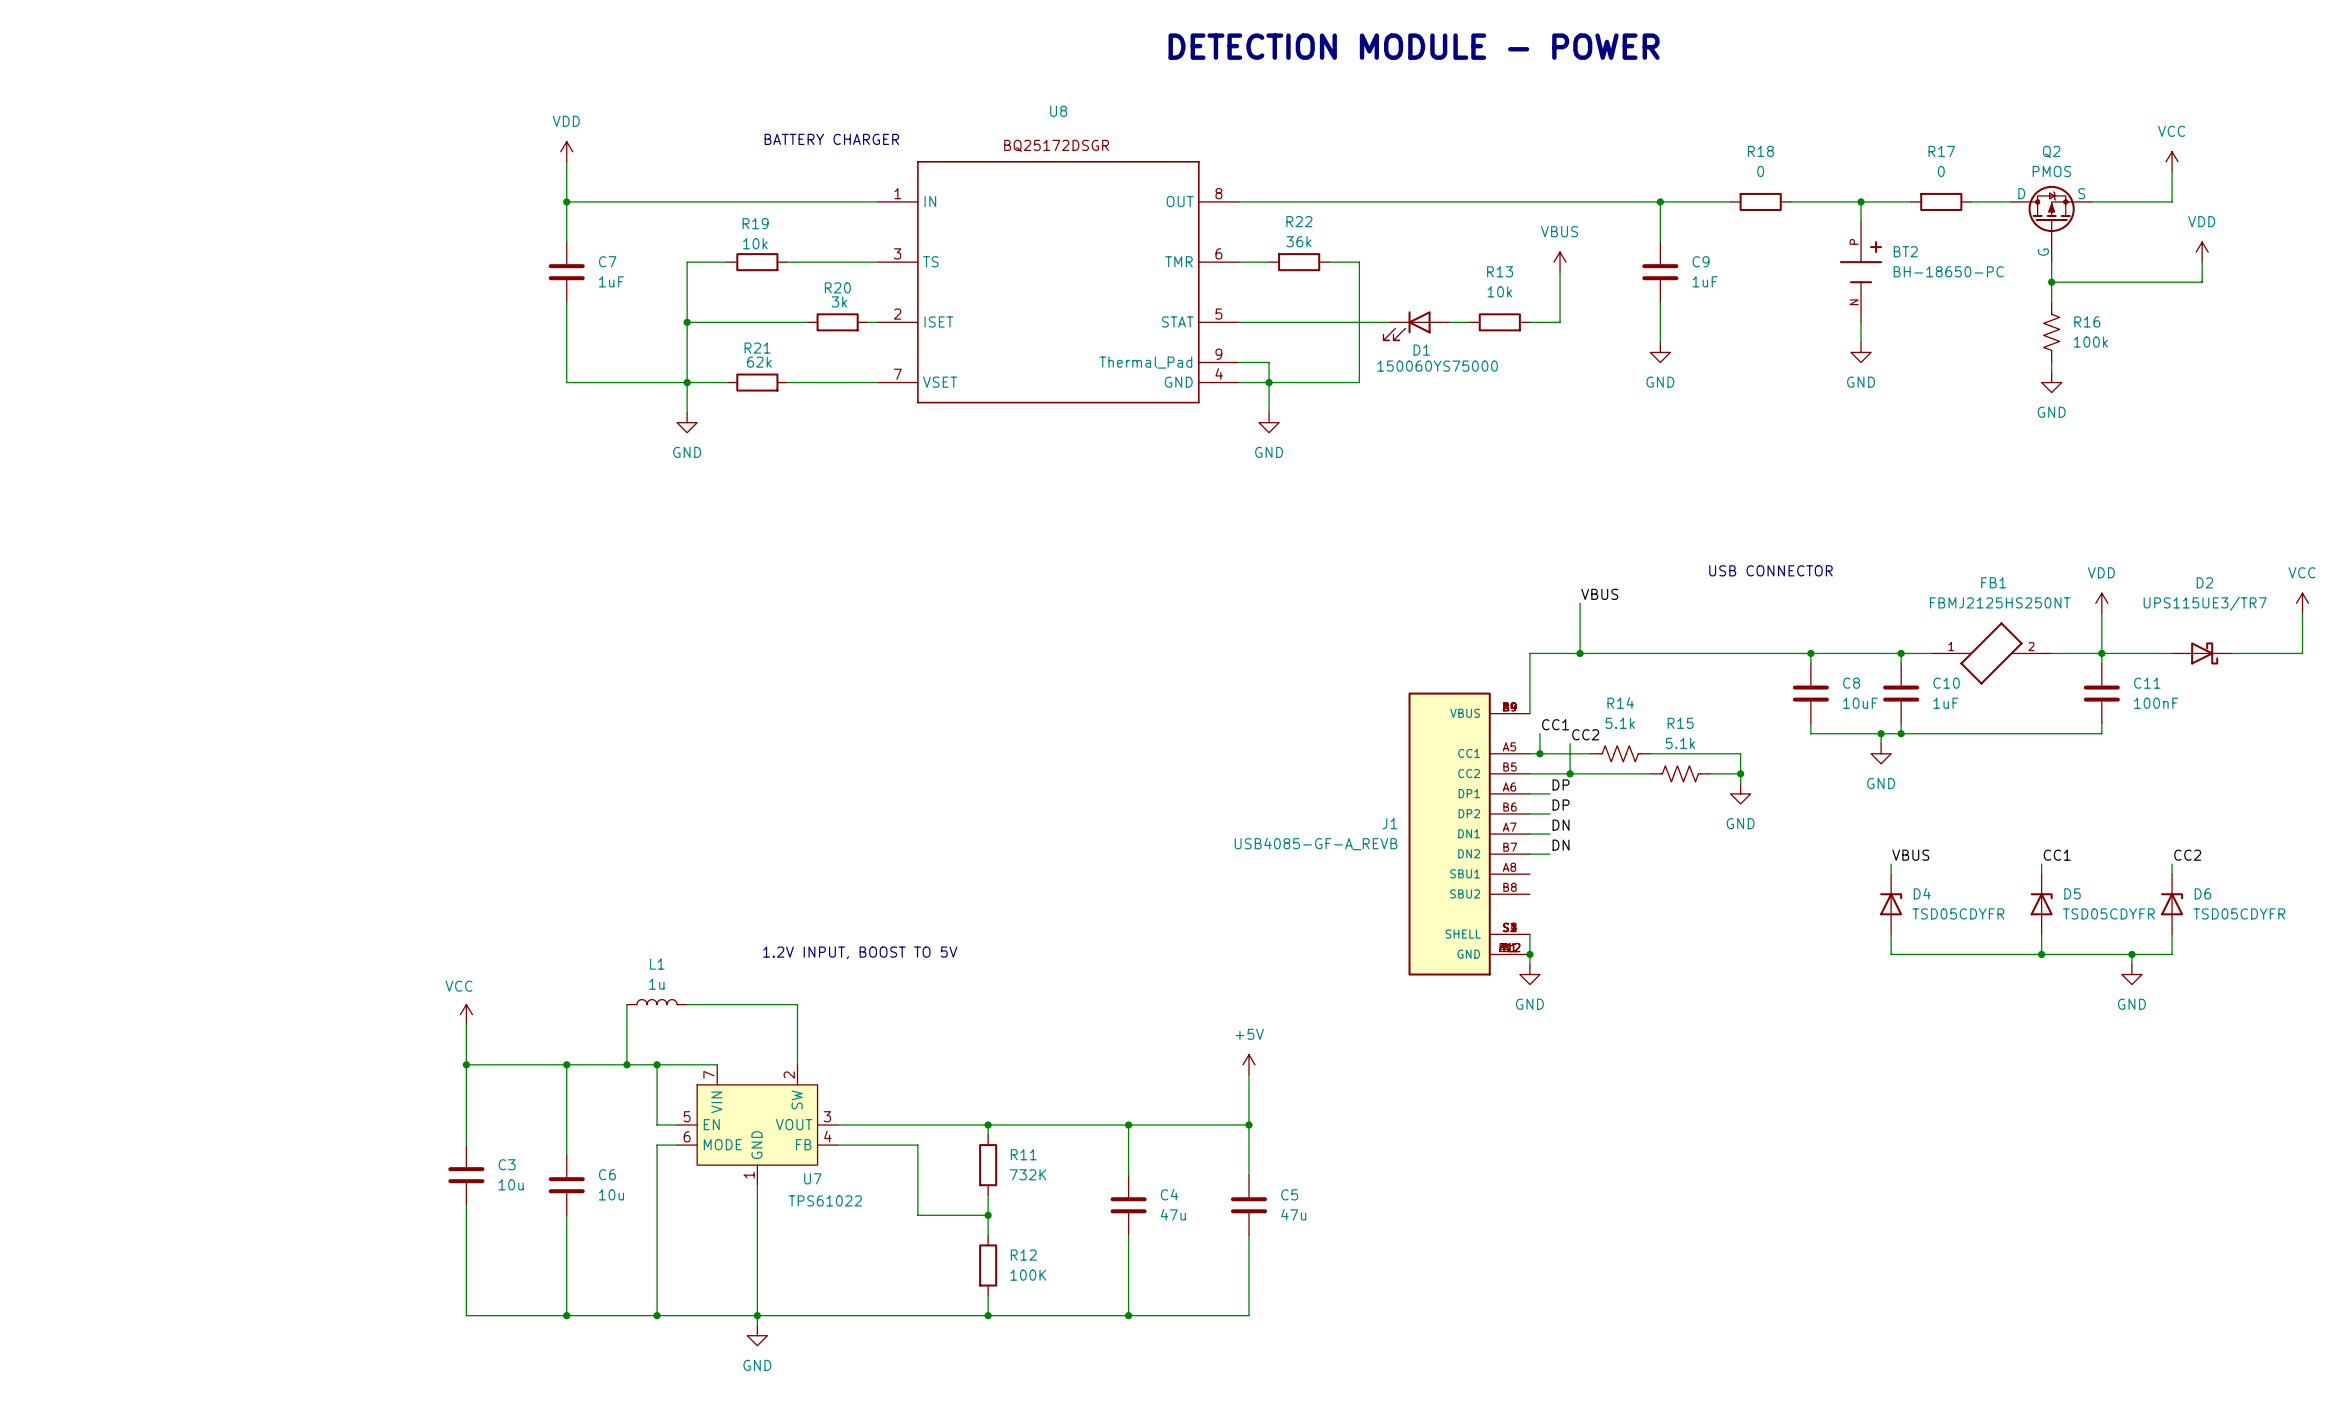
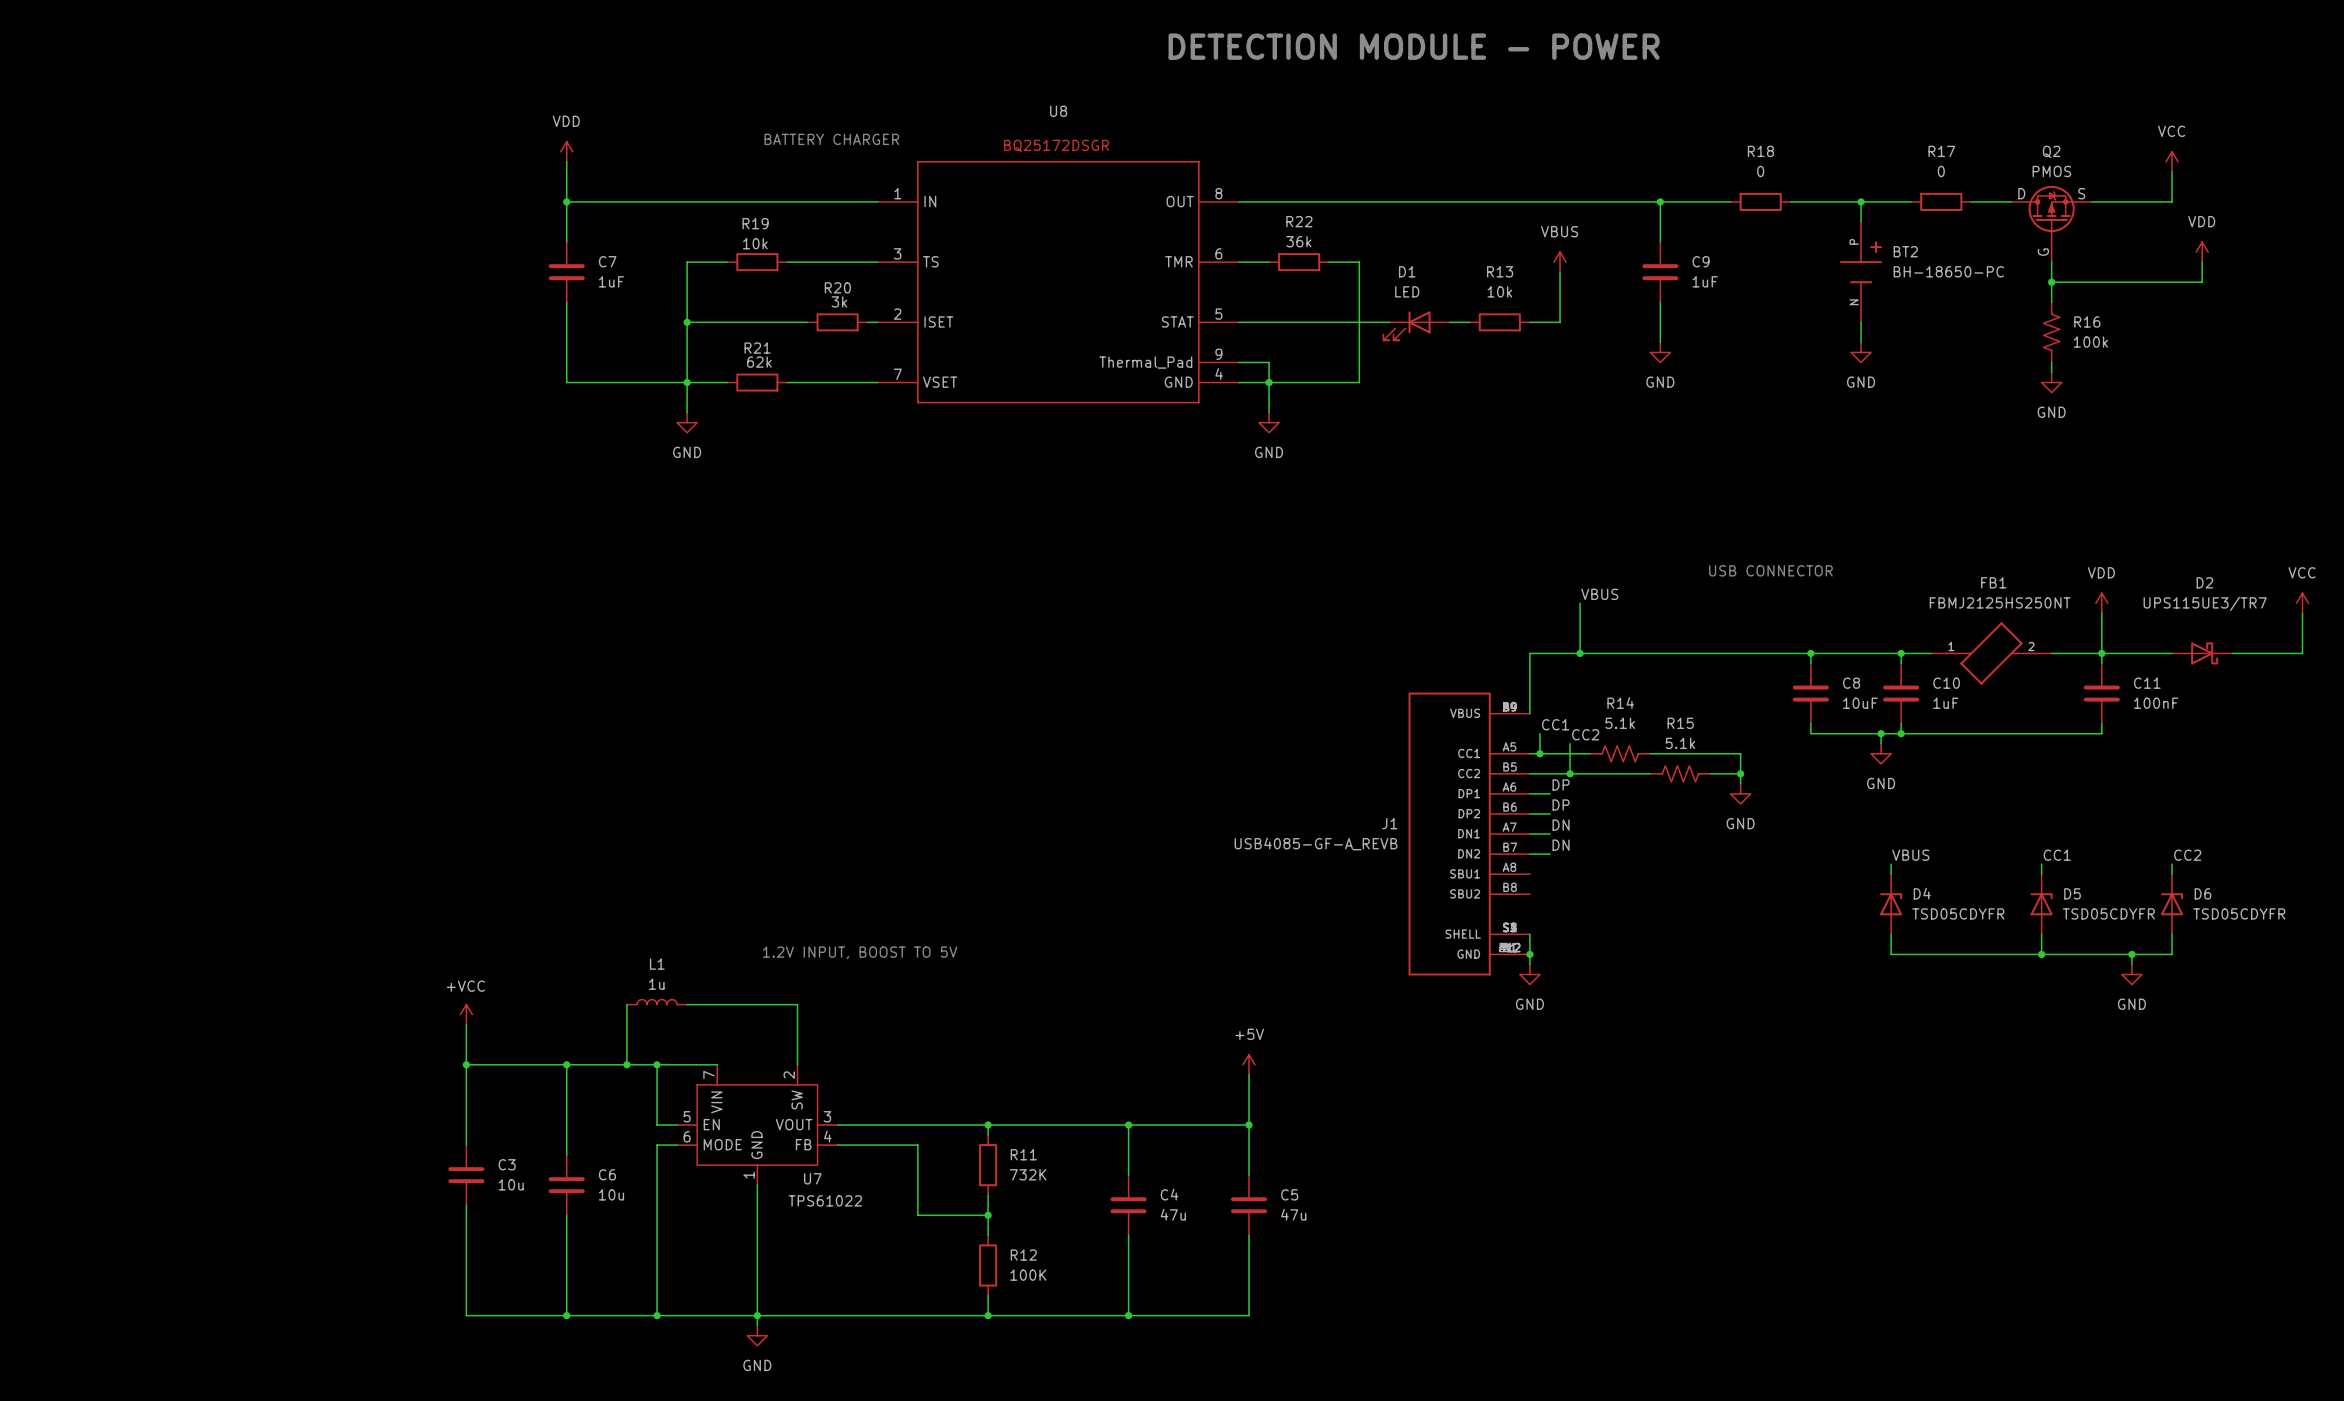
D1 name position: D1 (1421, 350) -> D1 (1407, 271)
D1 value: 150060YS75000 (1437, 366) -> LED (1407, 291)
power symbol: VCC (466, 1014) -> +VCC (466, 1014)

